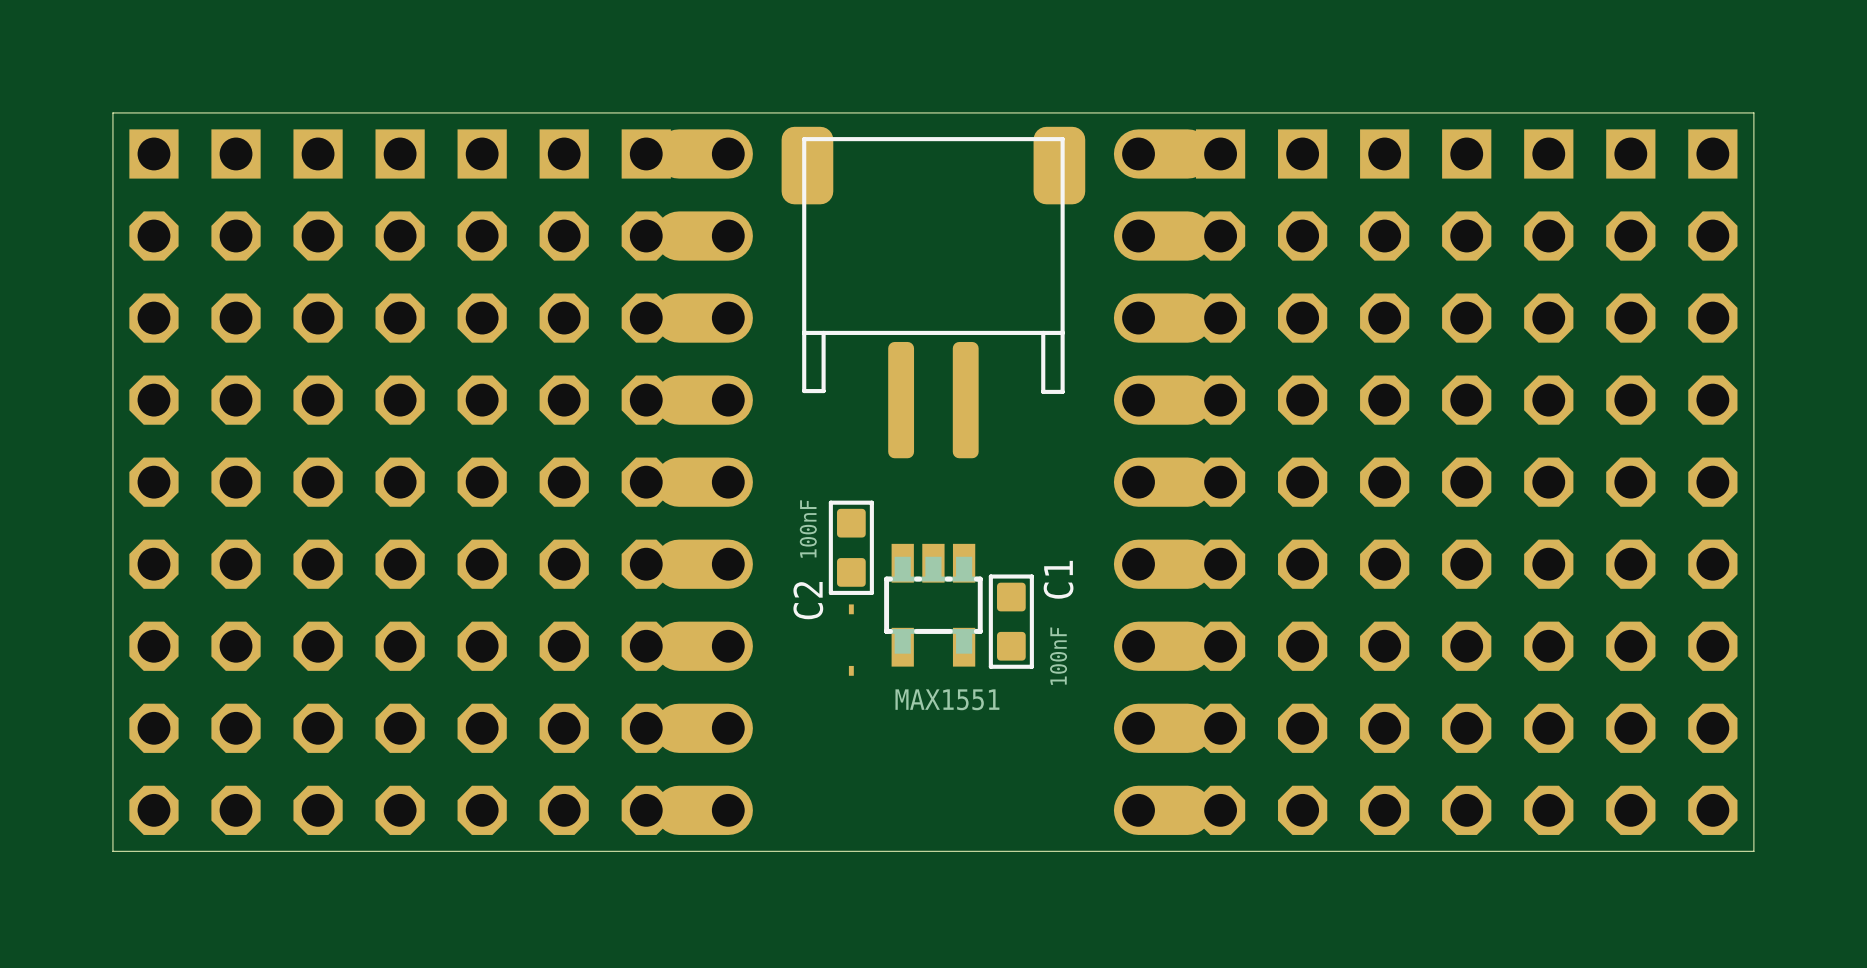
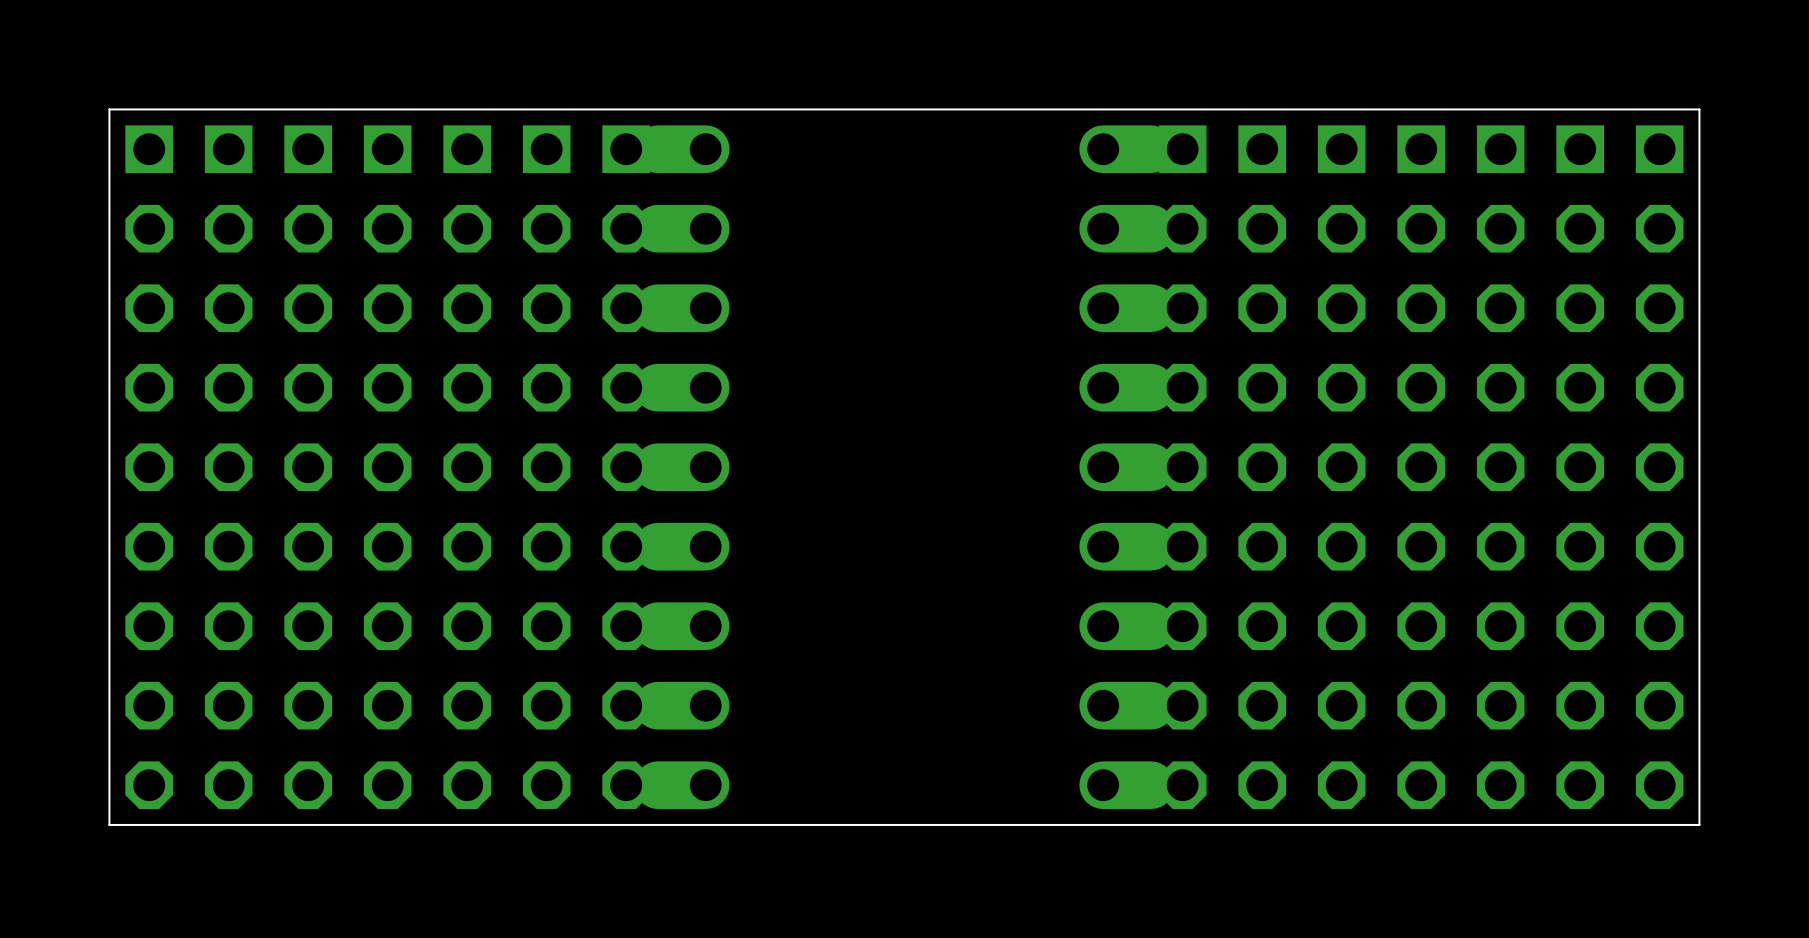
part: (933, 292) -> none
C2: 100nF (851, 547) -> none
part: MAX1551 (933, 605) -> none
C1: 100nF (1011, 621) -> none
part: (851, 640) -> none

